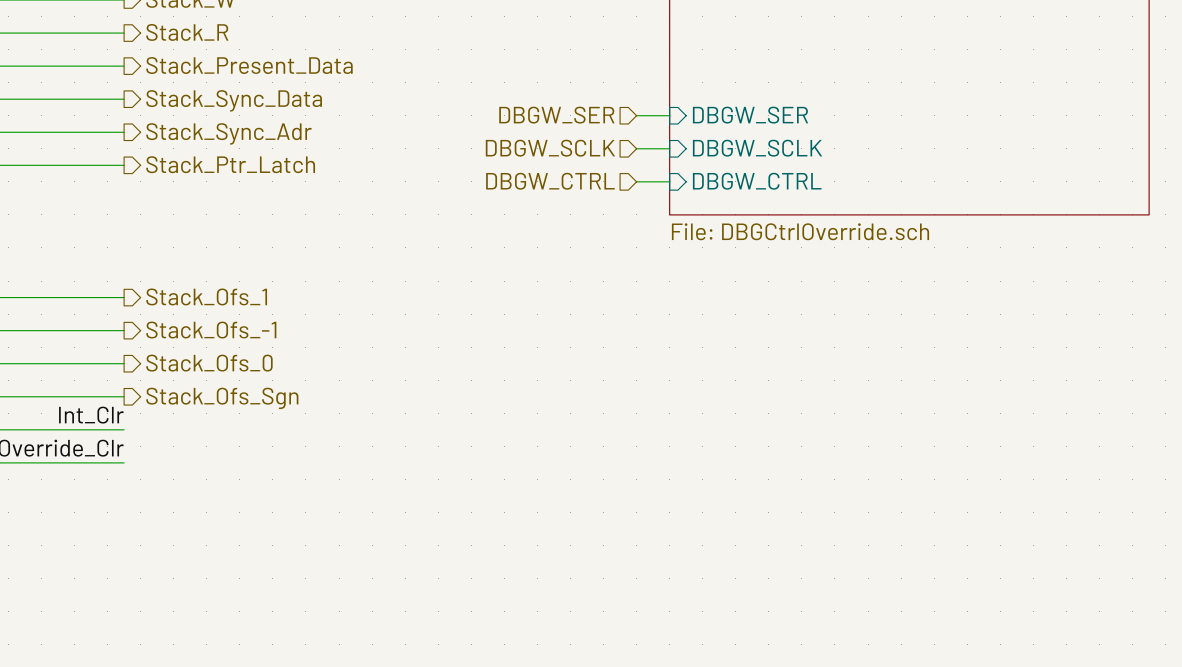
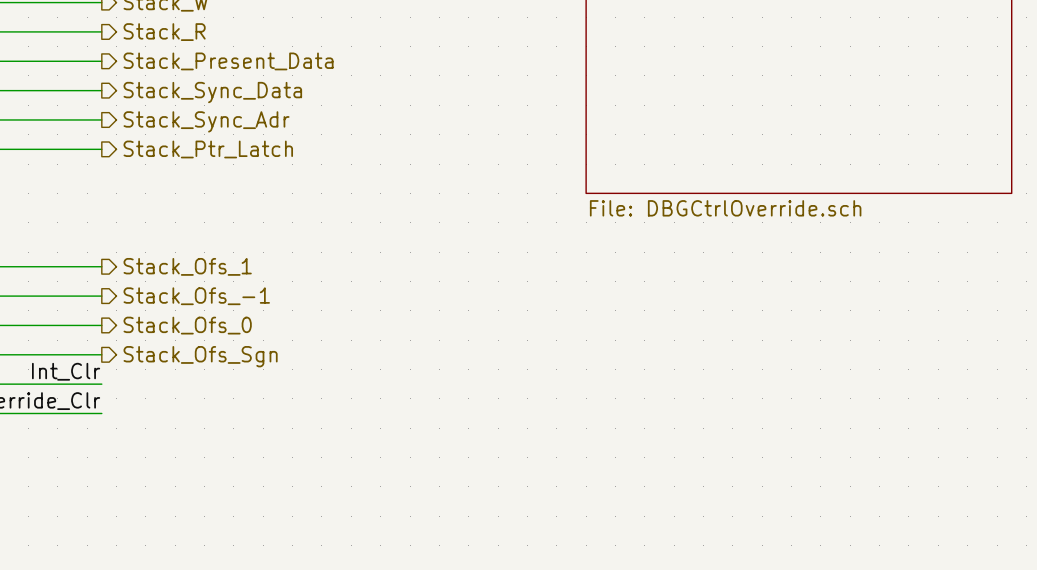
hierarchical label: DBGW_SER (556, 115) -> none
wire: (636, 115) (669, 115) -> none
sheet pin: DBGW_SER (750, 115) -> none
hierarchical label: DBGW_SCLK (550, 148) -> none
wire: (636, 148) (669, 148) -> none
sheet pin: DBGW_SCLK (757, 148) -> none
hierarchical label: DBGW_CTRL (550, 181) -> none
wire: (636, 181) (669, 181) -> none
sheet pin: DBGW_CTRL (757, 181) -> none

